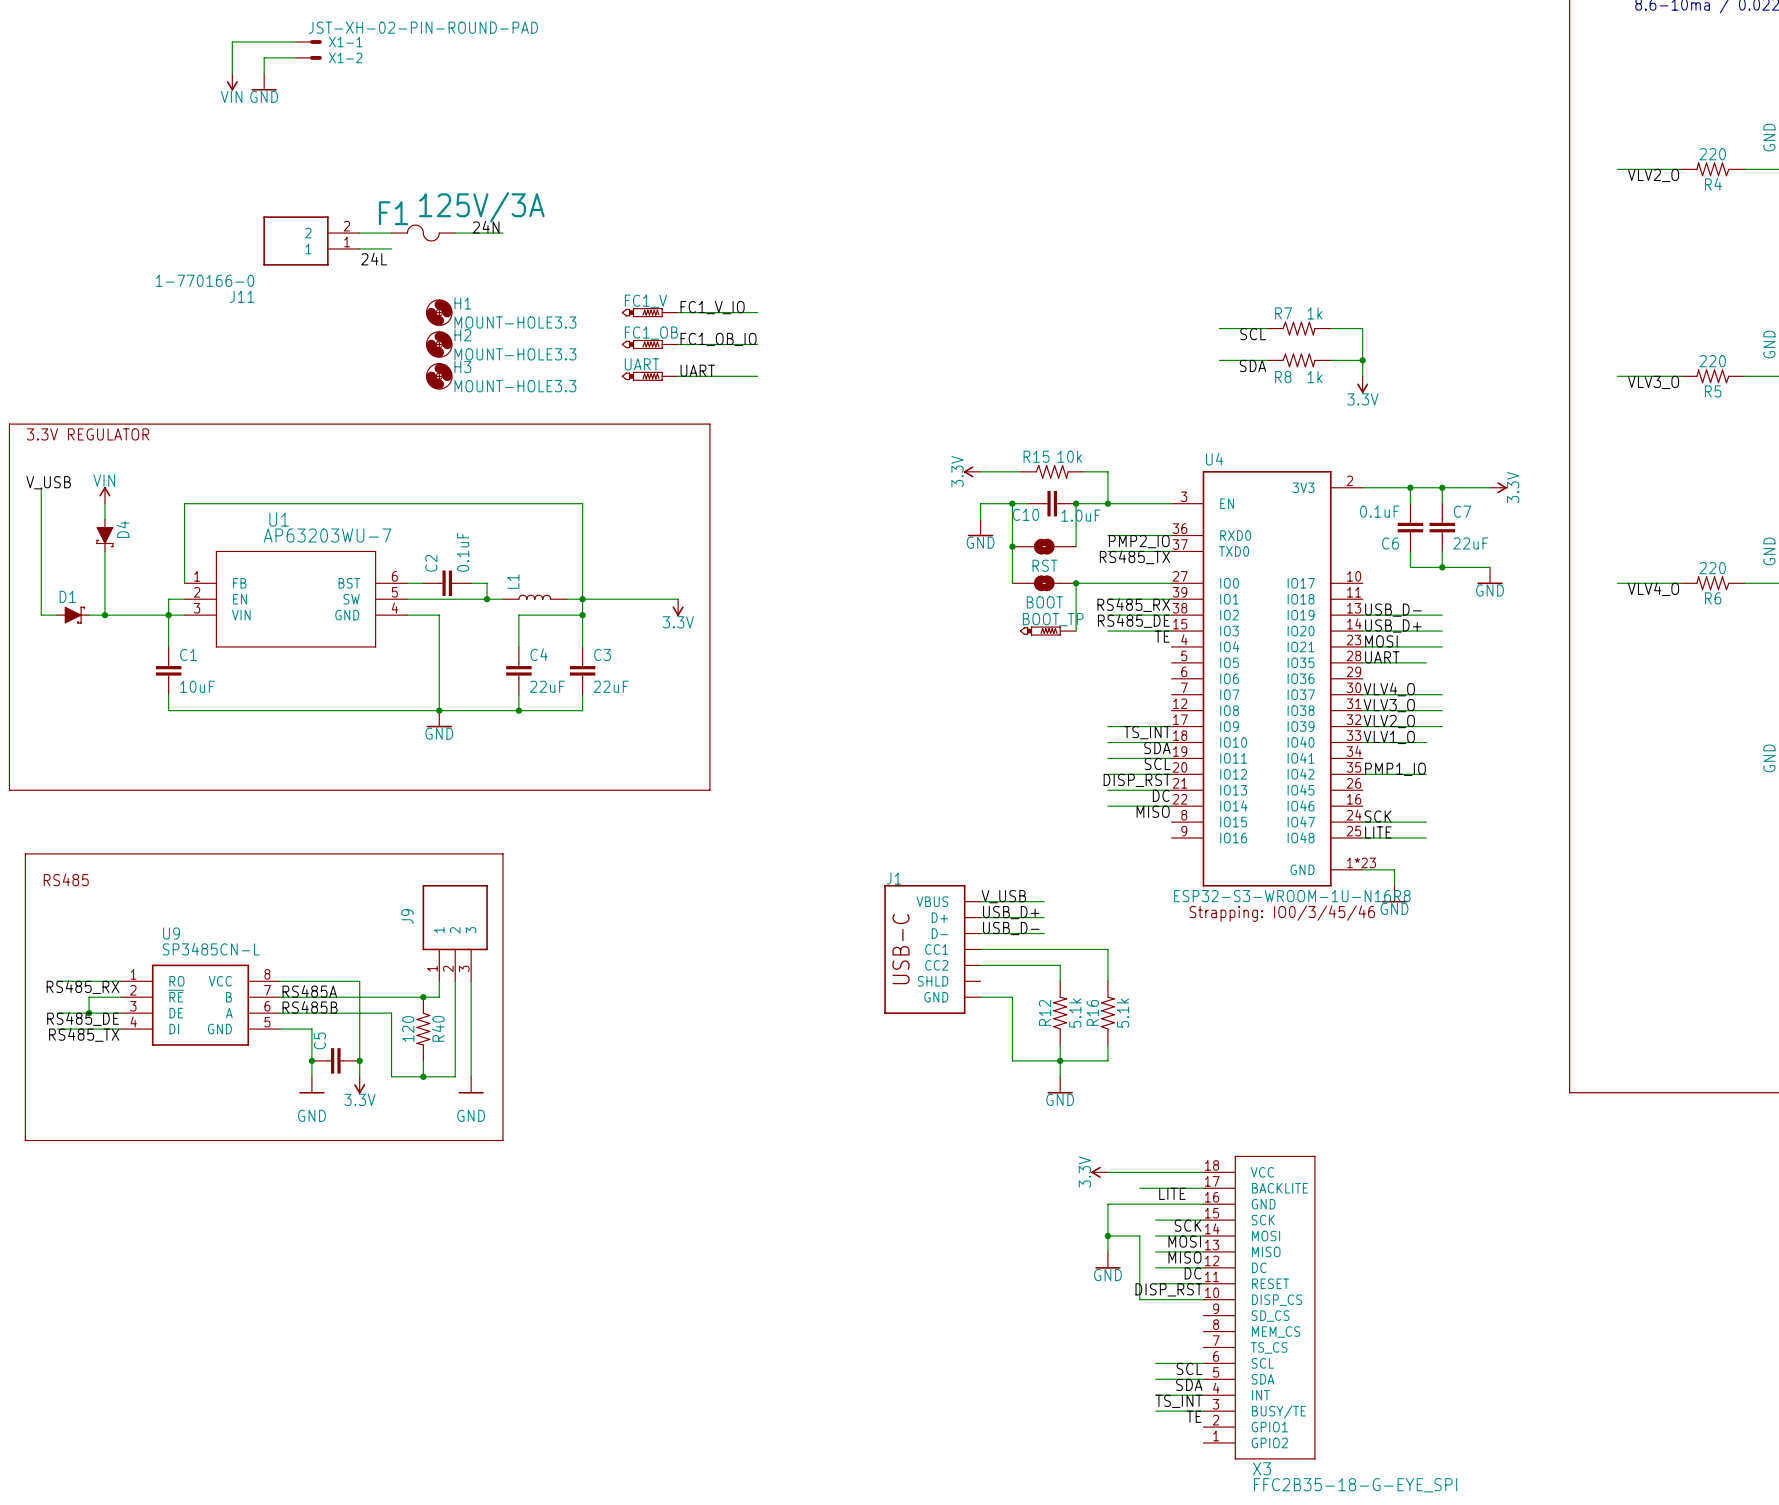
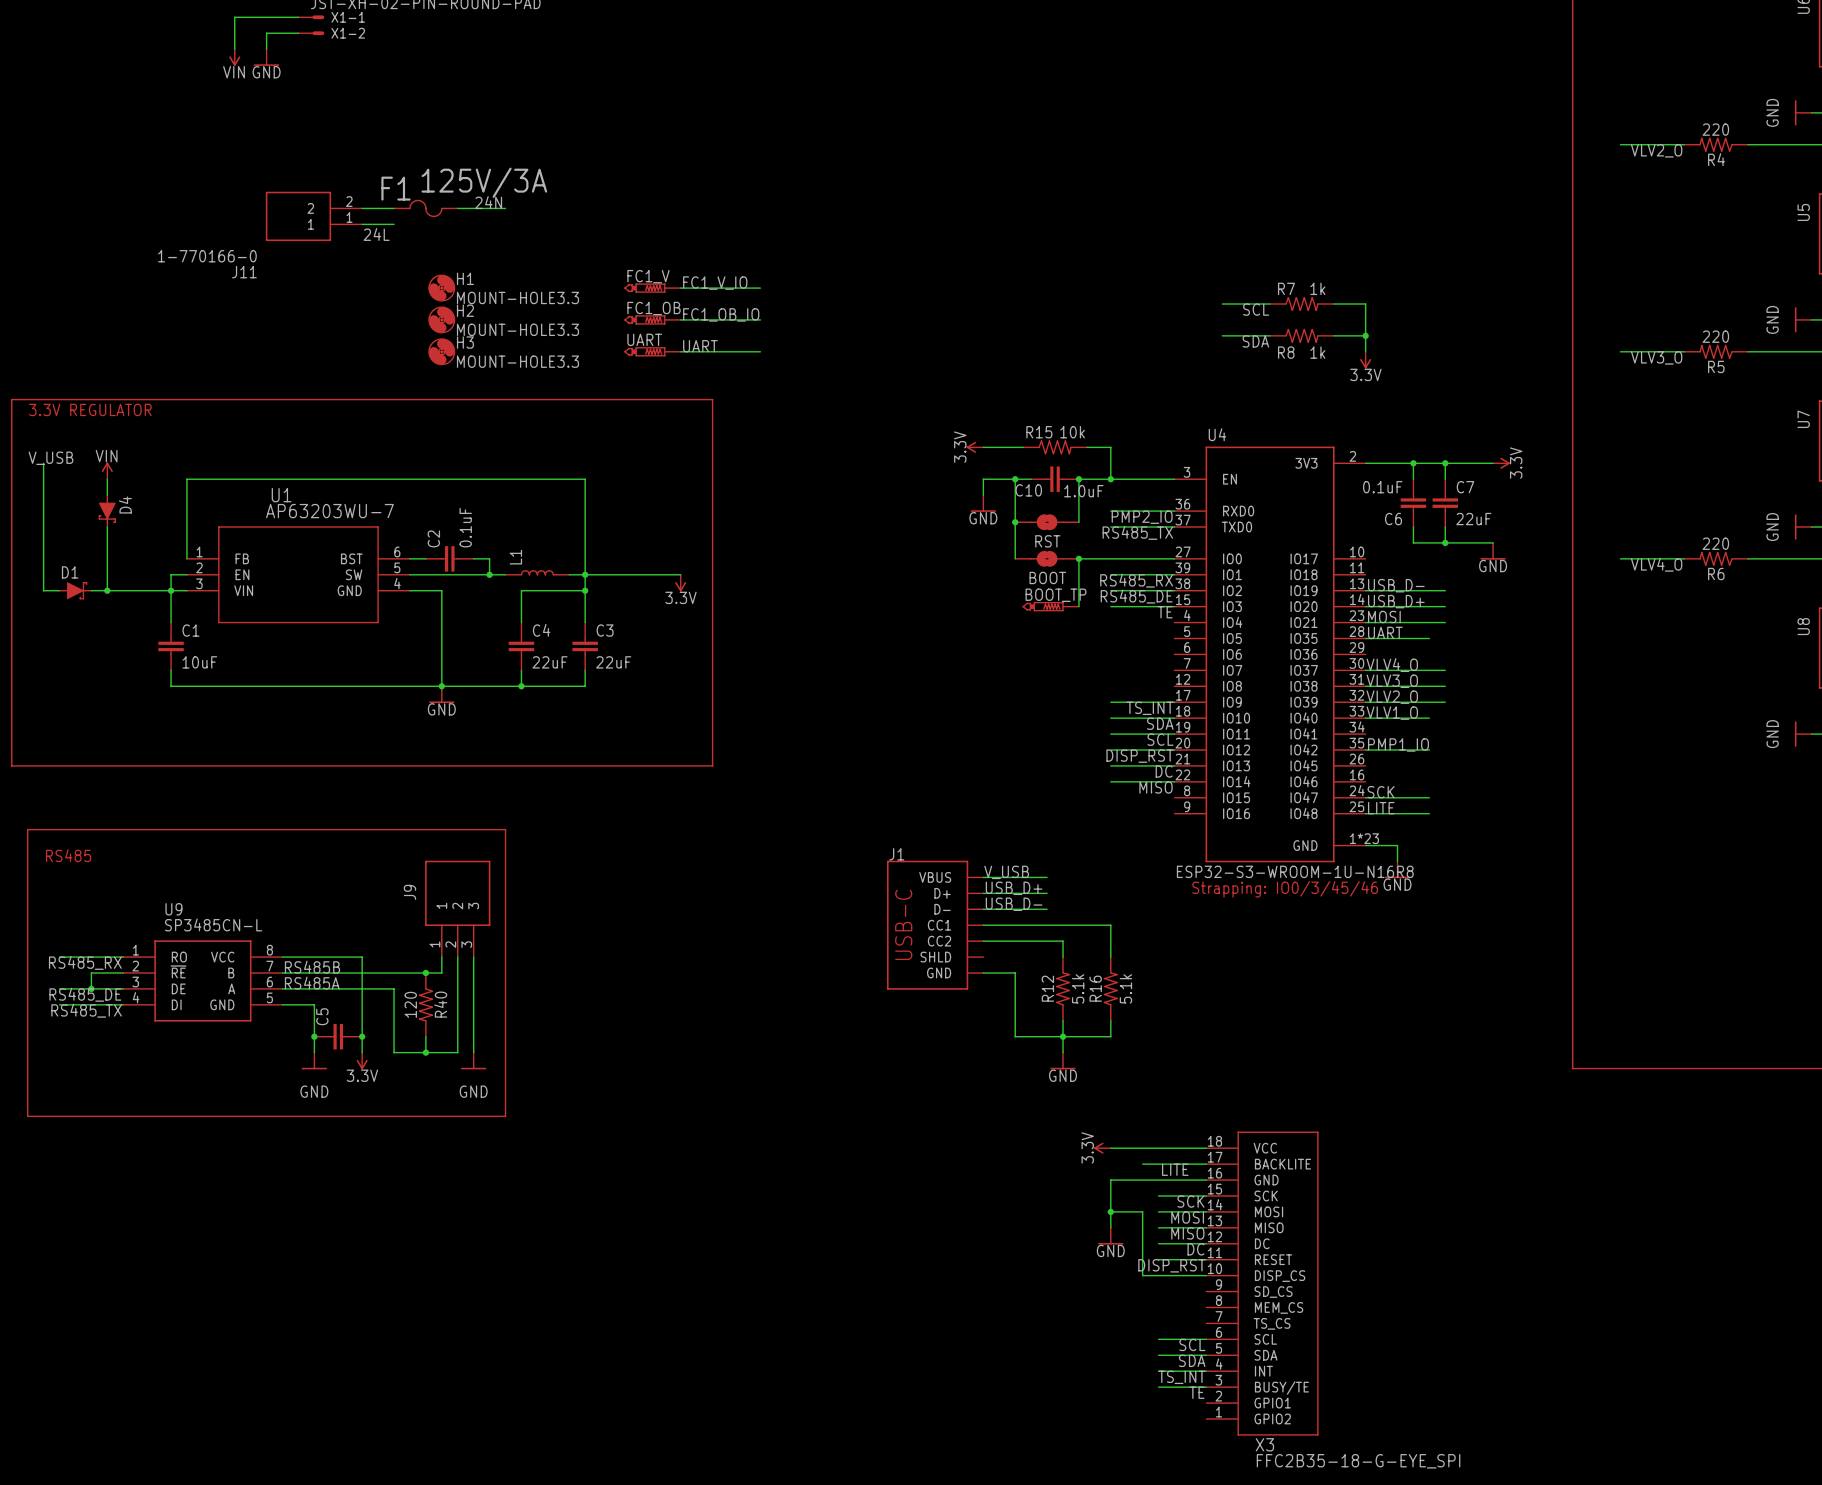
label: RS485A (309, 991) -> RS485B (312, 967)
label: RS485B (310, 1007) -> RS485A (312, 983)

